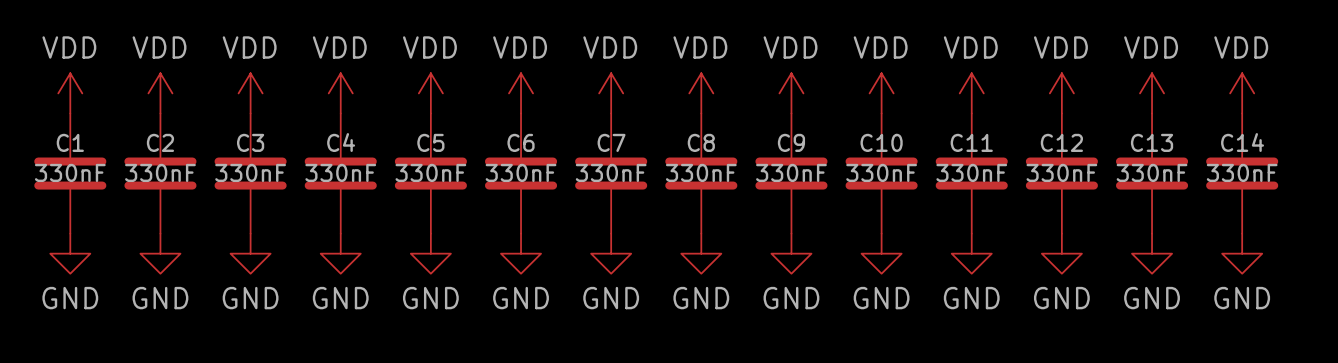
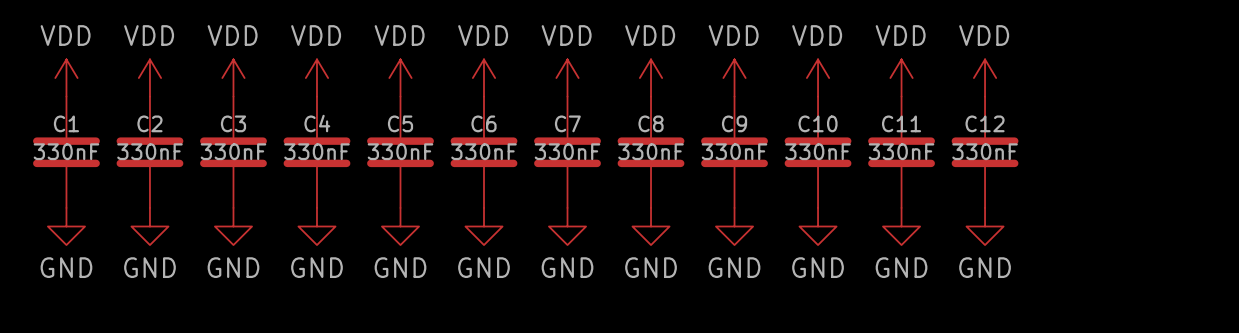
power symbol: VDD (1152, 93) -> none
power symbol: VDD (1242, 93) -> none
C13: 330nF (1152, 173) -> none
C14: 330nF (1242, 173) -> none
power symbol: GND (1152, 253) -> none
power symbol: GND (1242, 253) -> none

